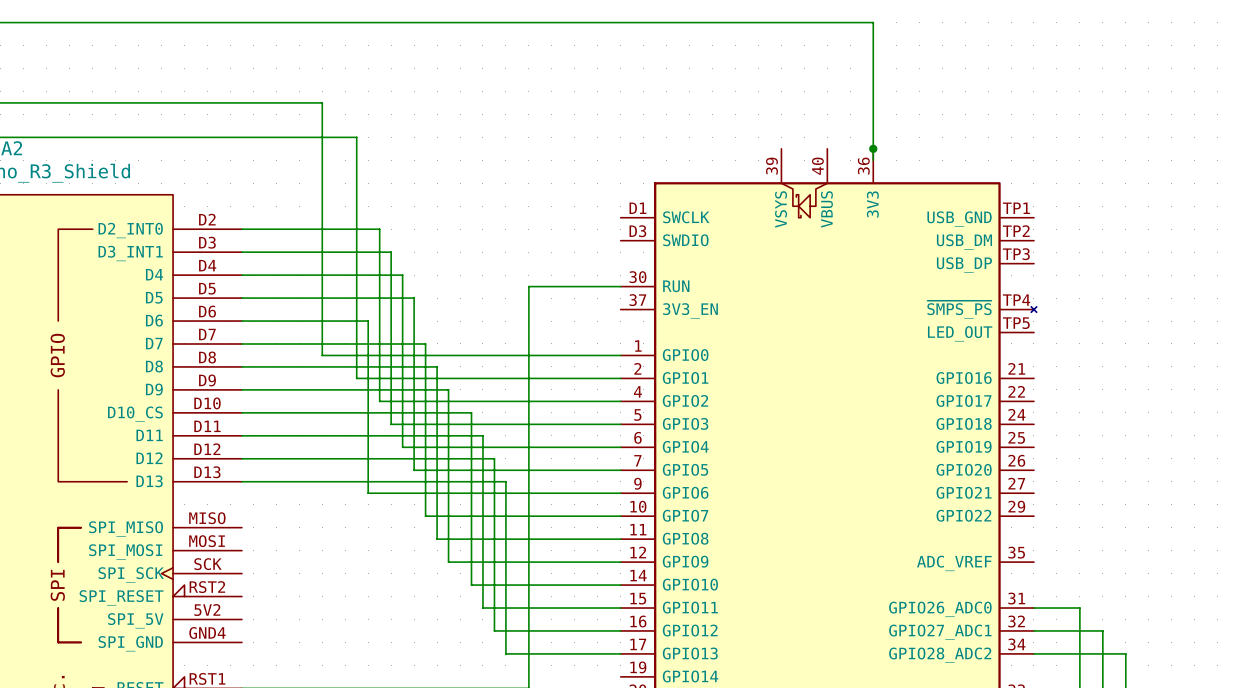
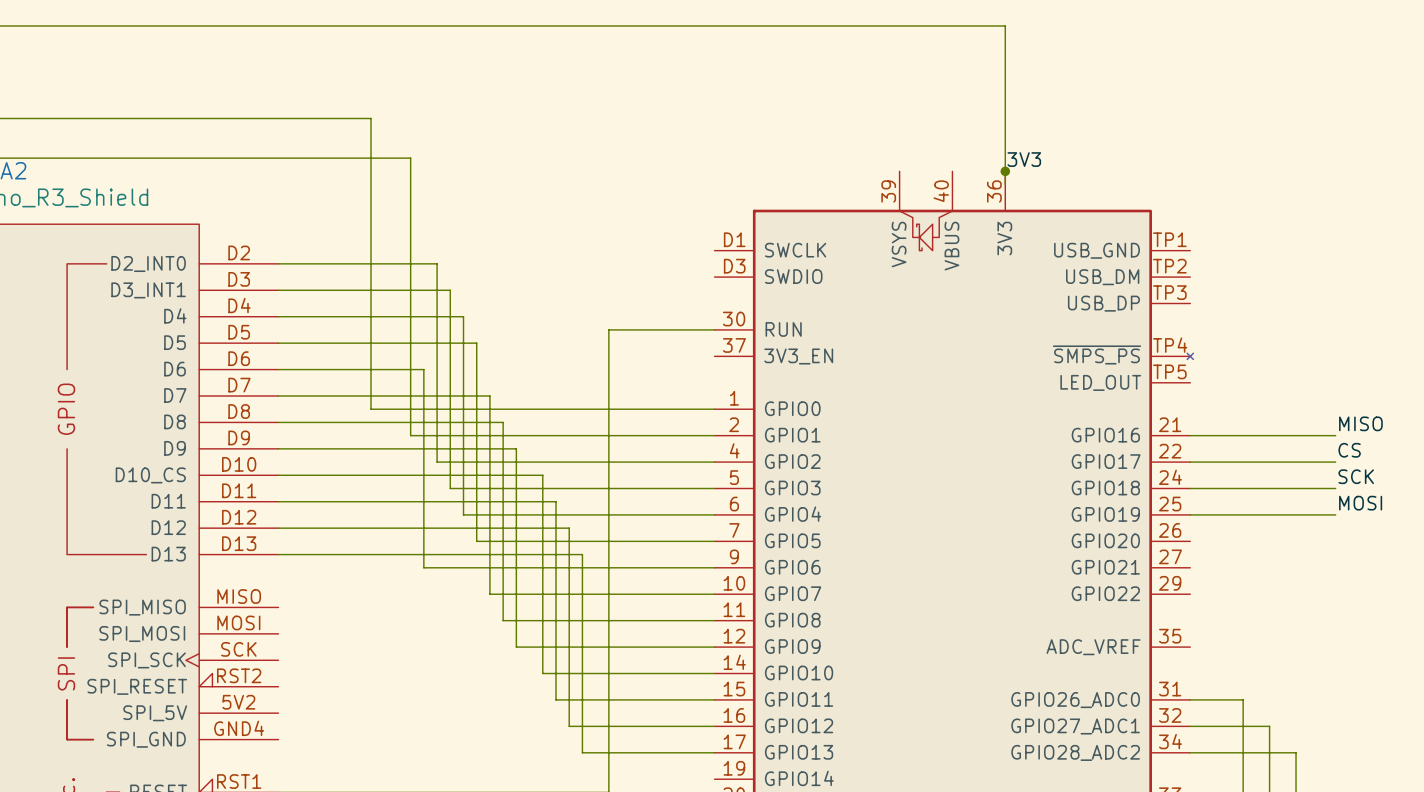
label: none -> 3V3 (1024, 159)
label: none -> MISO (1360, 423)
wire: none -> (1190, 435) (1335, 435)
label: none -> CS (1349, 450)
wire: none -> (1190, 462) (1335, 462)
label: none -> SCK (1356, 476)
wire: none -> (1190, 488) (1335, 488)
label: none -> MOSI (1360, 503)
wire: none -> (1190, 514) (1335, 514)

